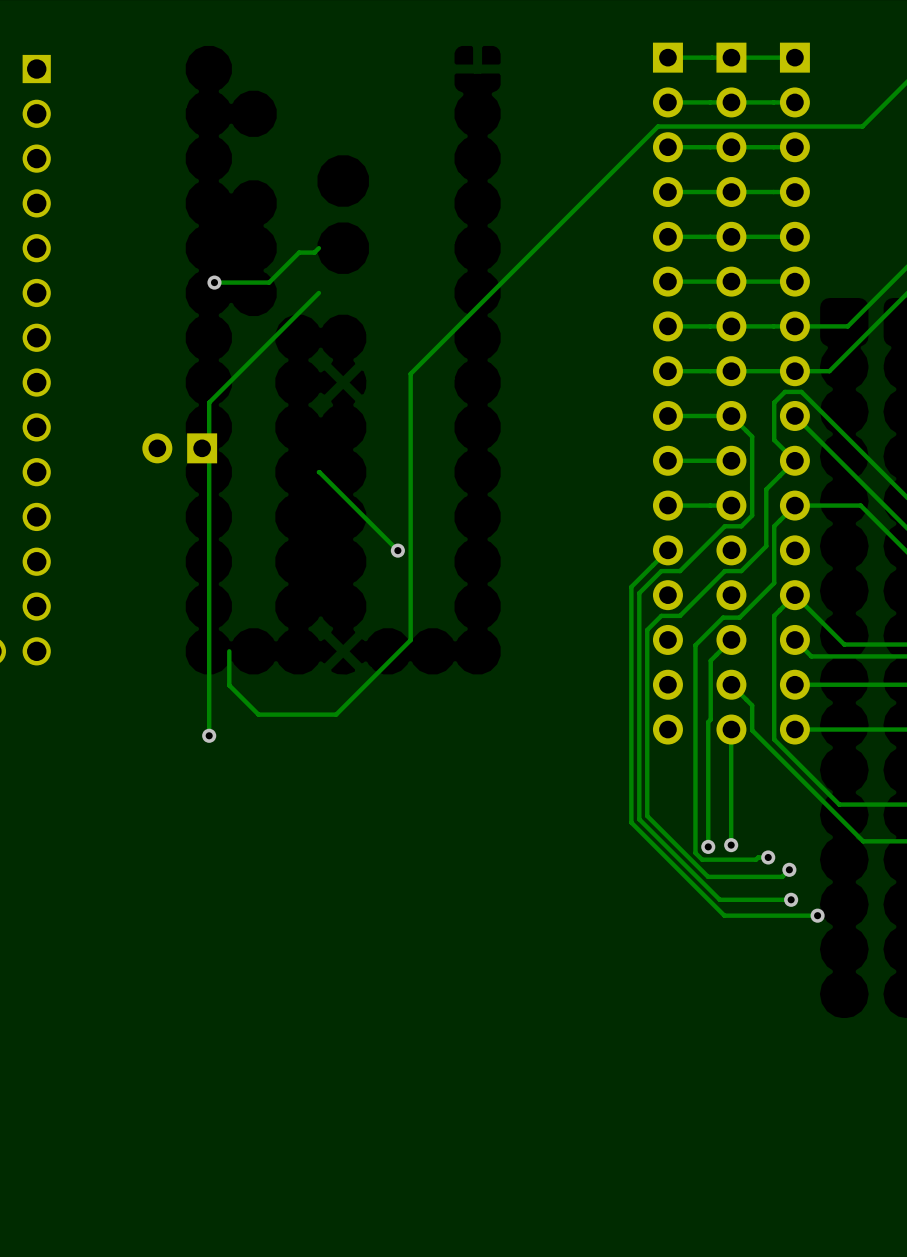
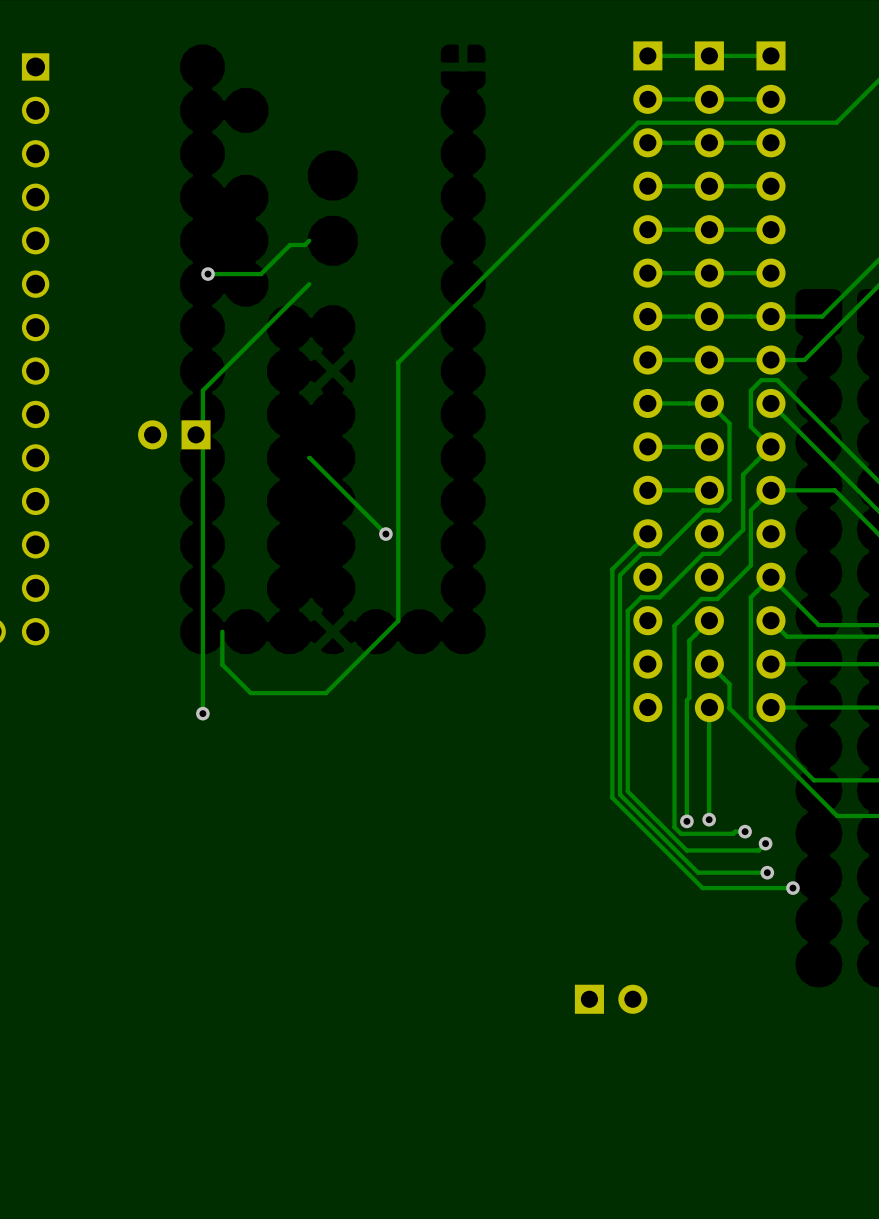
part: none -> (611, 999)

